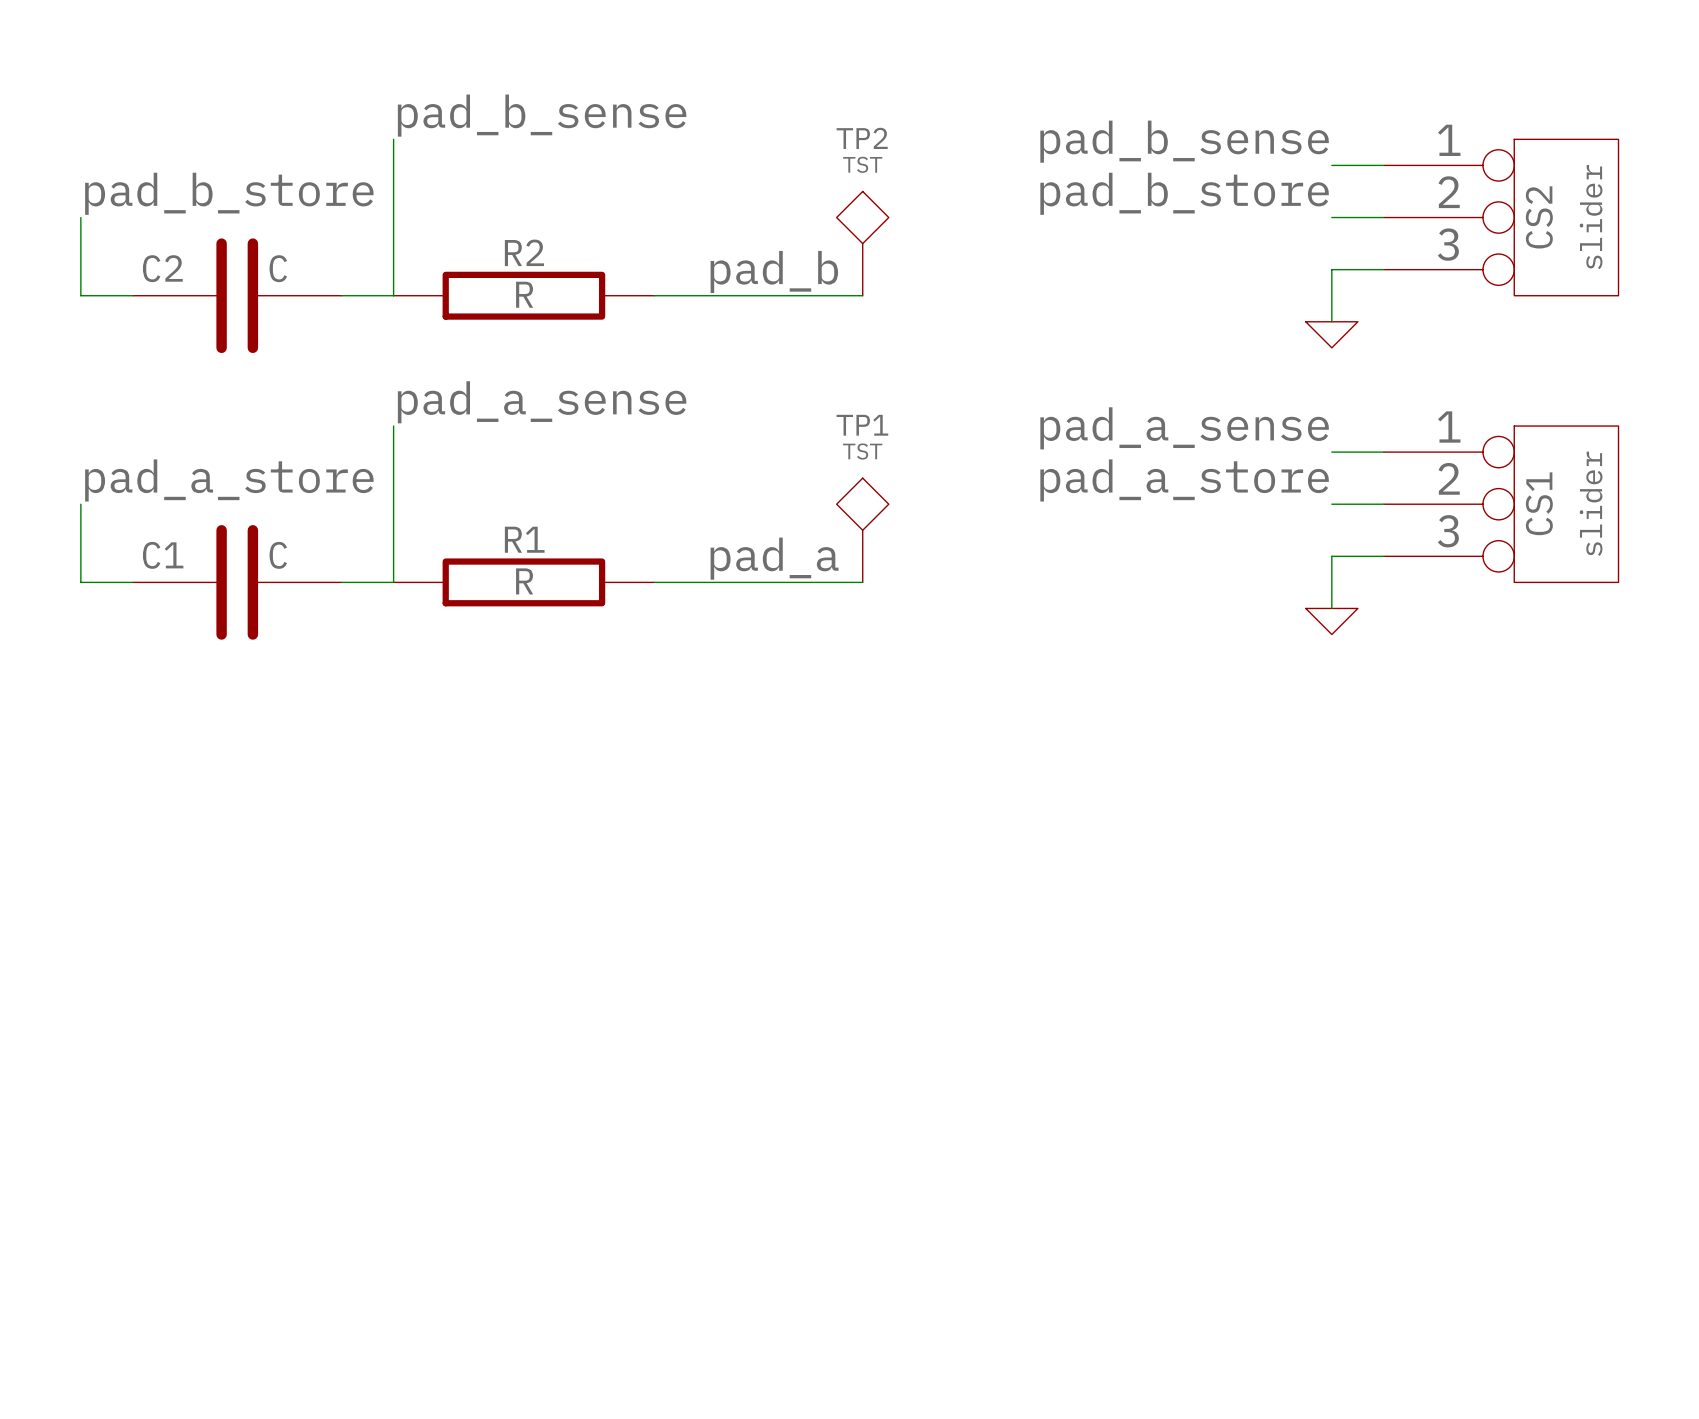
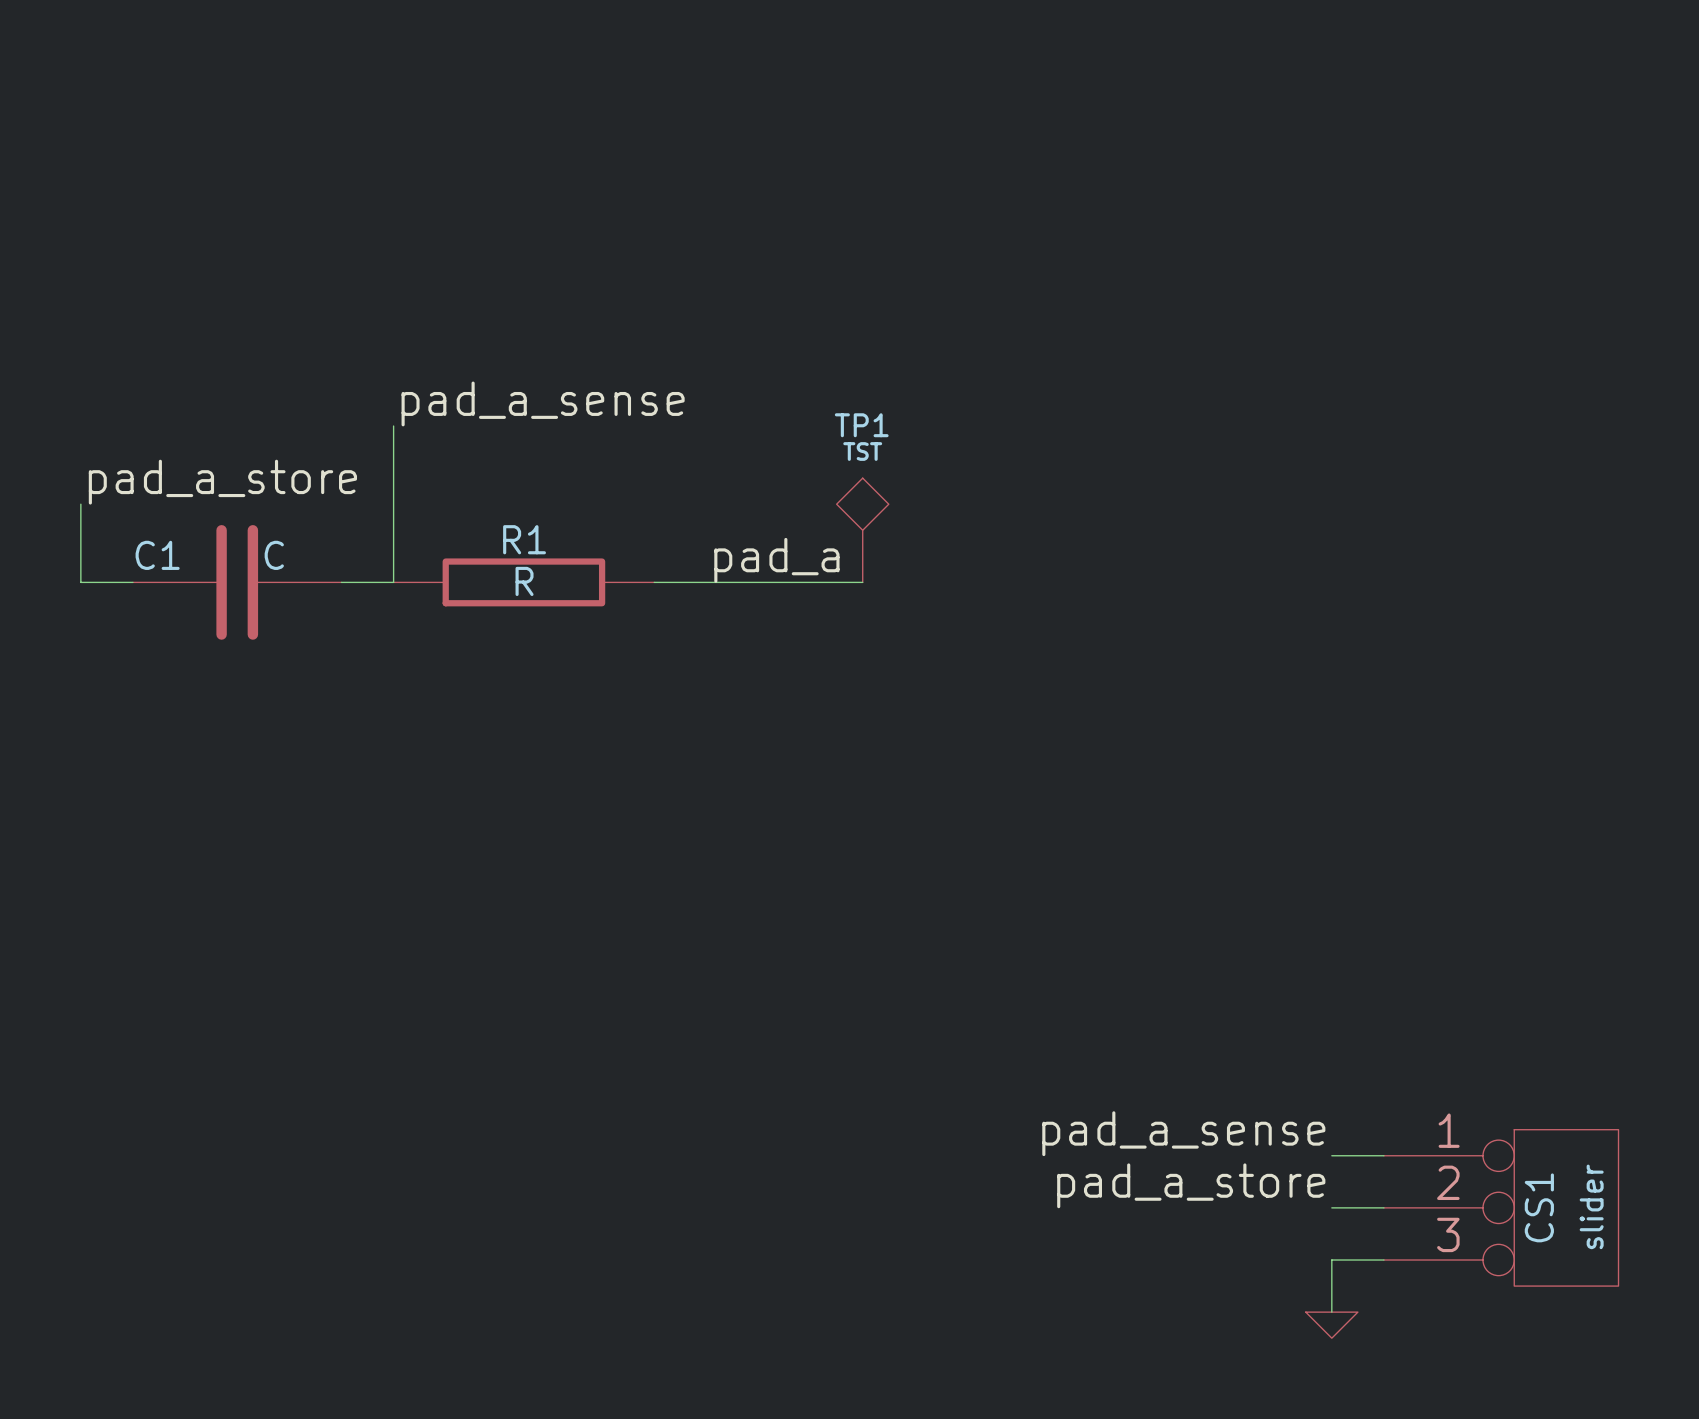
label: pad_b_sense (542, 115) -> none
wire: (393, 139) (393, 295) (341, 295) -> none
label: pad_b_sense (1184, 141) -> none
wire: (1331, 165) (1383, 165) -> none
label: pad_b_store (229, 193) -> none
label: pad_b_store (1184, 193) -> none
wire: (80, 217) (80, 295) (132, 295) -> none
wire: (1331, 217) (1383, 217) -> none
CS2: slider (1501, 217) -> none
TP2: TST (862, 243) -> none
wire: (1383, 269) (1331, 269) (1331, 321) -> none
label: pad_b (774, 271) -> none
C2: C (237, 295) -> none
R2: R (523, 295) -> none
wire: (654, 295) (862, 295) -> none
power symbol: (1331, 334) -> none
label: pad_a_sense (1184, 428) -> none
wire: (1331, 452) (1383, 452) -> none
label: pad_a_store (1184, 480) -> none
wire: (1331, 504) (1383, 504) -> none
CS1 position: (1501, 504) -> (1501, 1207)
wire: (1383, 556) (1331, 556) (1331, 608) -> none
power symbol: (1331, 621) -> none
label: none -> pad_a_sense (1183, 1133)
wire: none -> (1331, 1155) (1383, 1155)
label: none -> pad_a_store (1191, 1185)
wire: none -> (1331, 1207) (1383, 1207)
wire: none -> (1383, 1260) (1331, 1260) (1331, 1312)
power symbol: none -> (1331, 1325)

